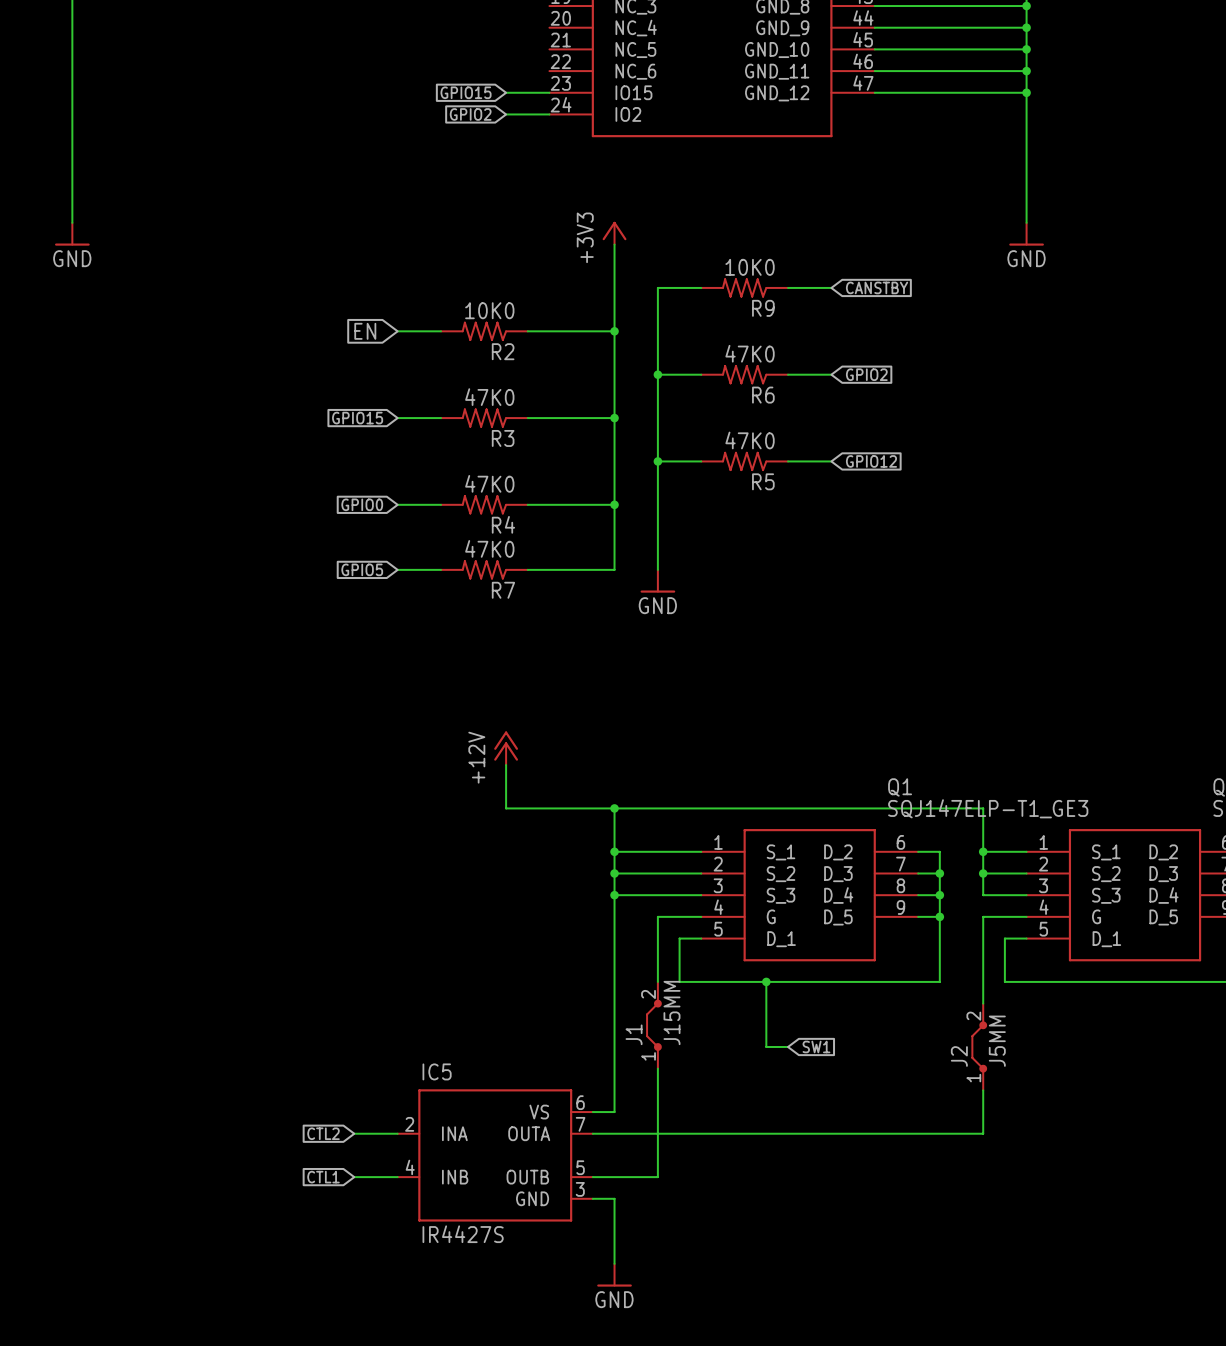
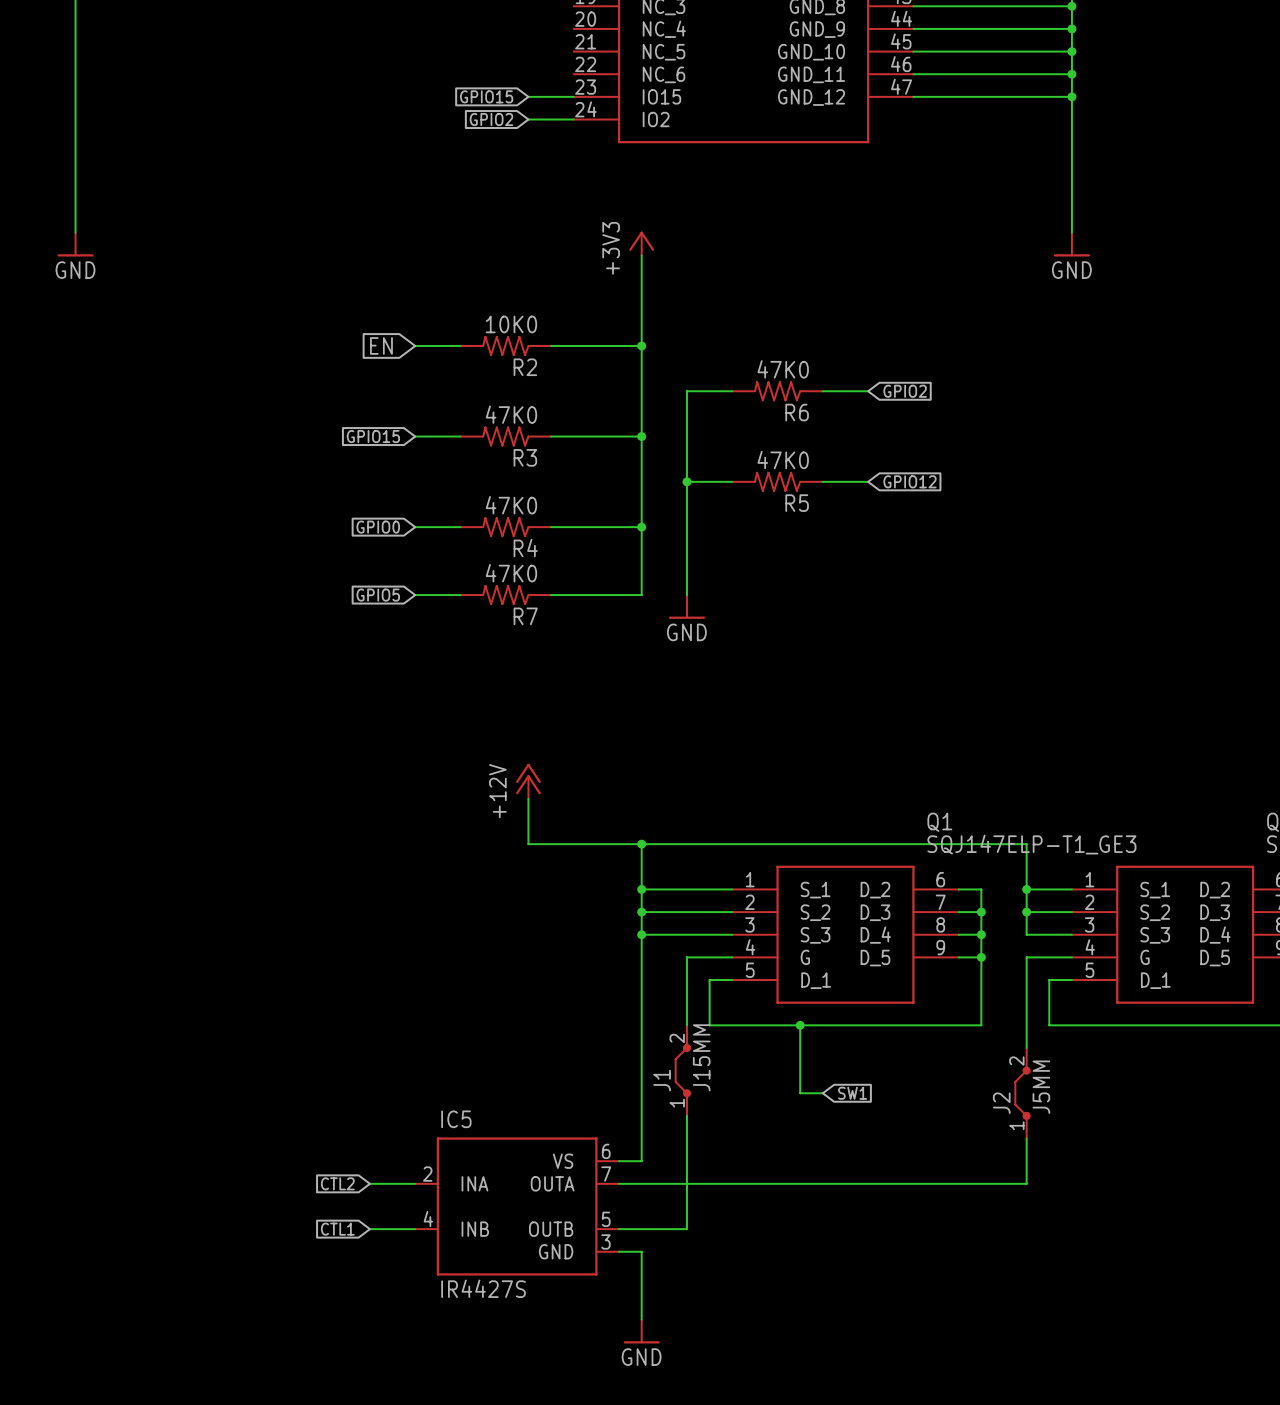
wire: (701, 287) (657, 287) (657, 374) -> none
R9: 10K0 (744, 287) -> none
wire: (788, 287) (831, 287) -> none
global label: CANSTBY (877, 287) -> none
junction: (657, 374) -> none

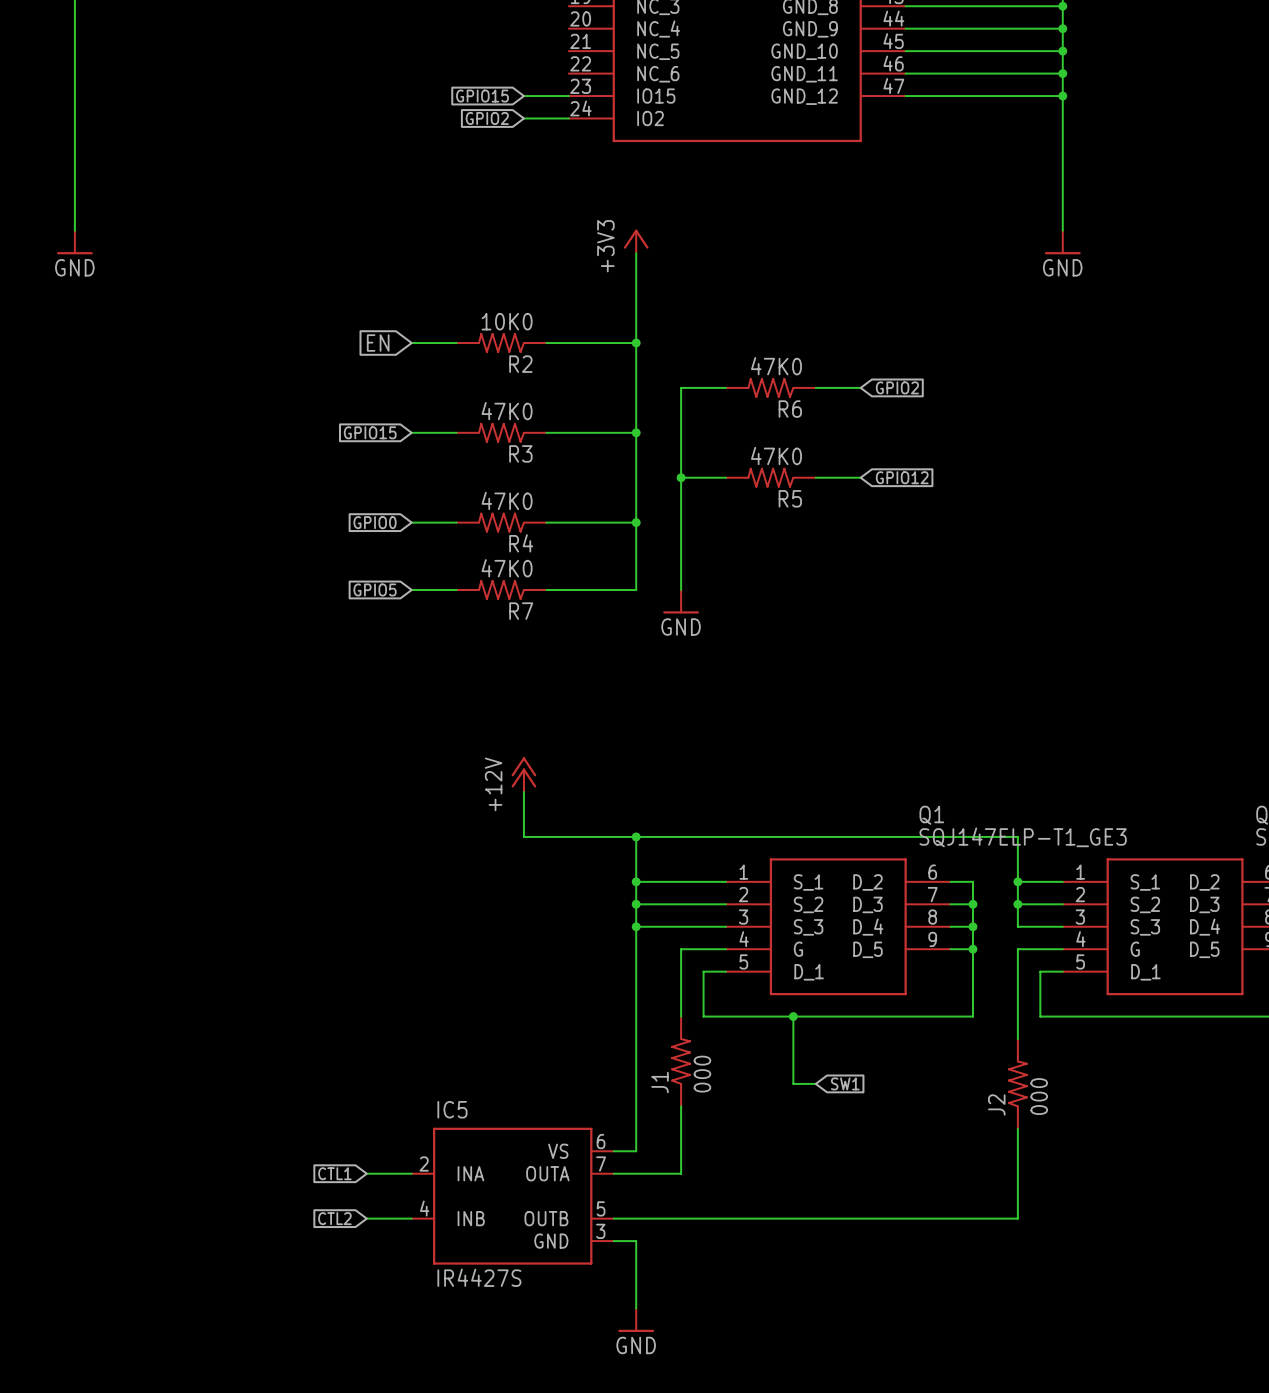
J1 symbol: [674, 1025, 692, 1116] -> [671, 1016, 691, 1107]
J2 symbol: [1014, 1047, 1031, 1139] -> [1008, 1039, 1028, 1129]
J1 value: J15MM (701, 1057) -> 000 (702, 1074)
J2 value: J5MM (1041, 1087) -> 000 (1039, 1096)
global label: CTL2 (337, 1183) -> CTL1 (334, 1173)
wire: (1026, 1183) (686, 1183) (686, 1229) -> (1017, 1173) (1017, 1218) (681, 1218)
global label: CTL1 (337, 1229) -> CTL2 (334, 1218)

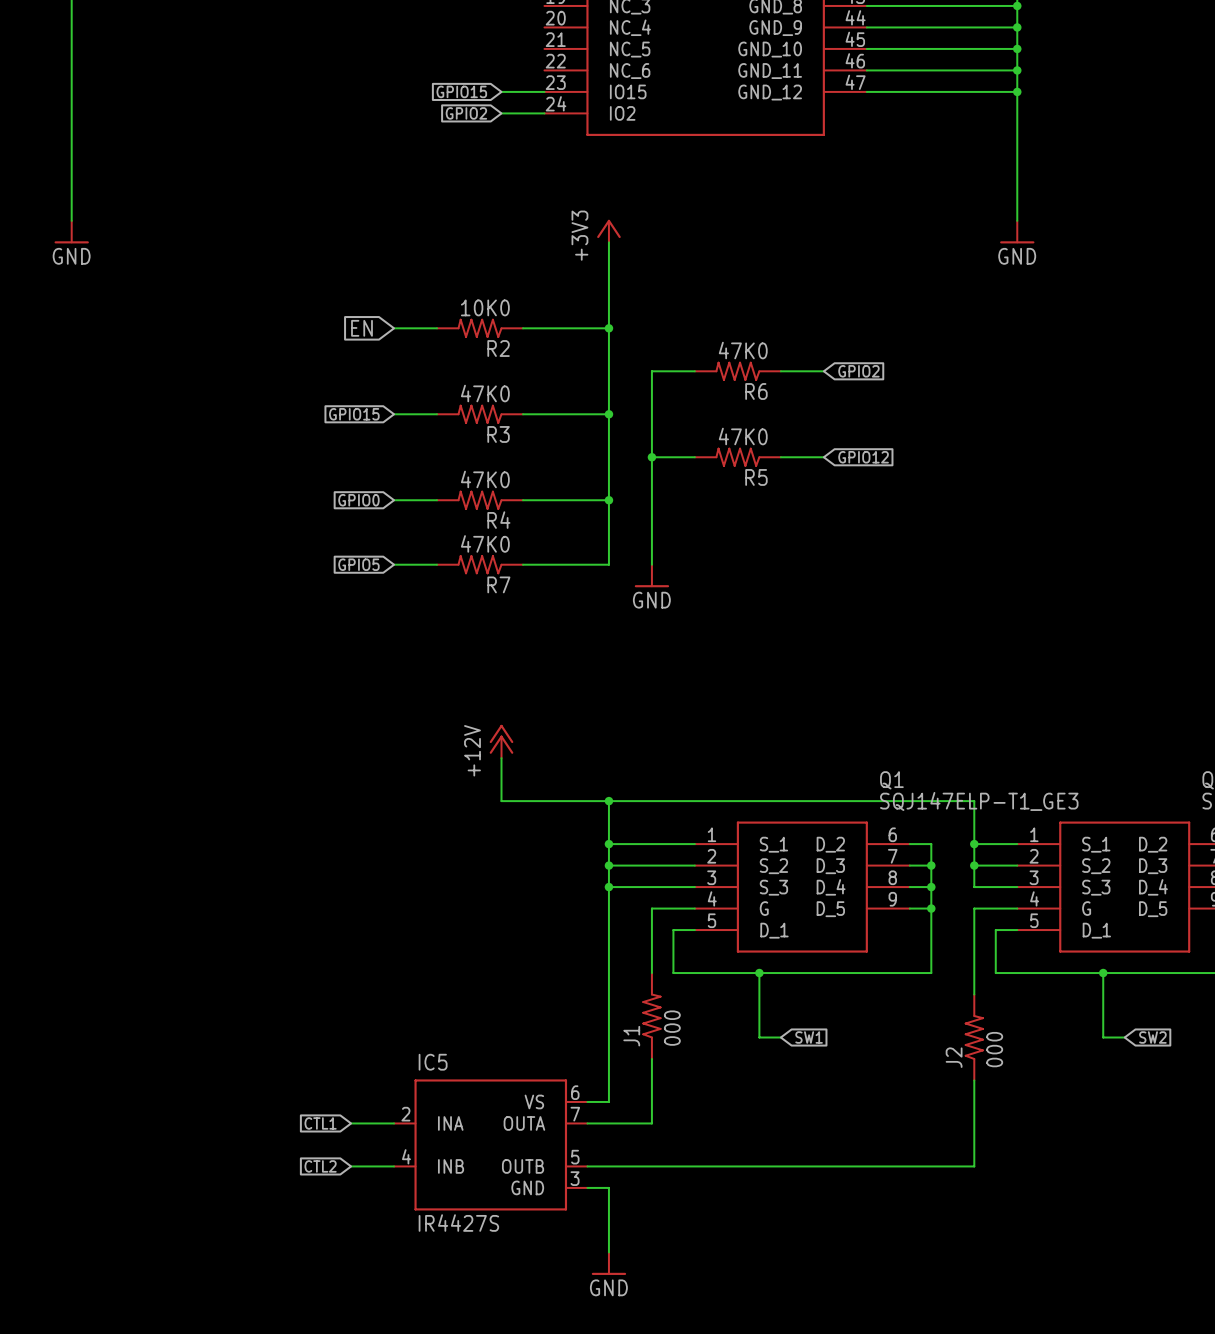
wire: none -> (1103, 973) (1103, 1037) (1124, 1037)
junction: none -> (1103, 973)
global label: none -> SW2 (1152, 1037)

